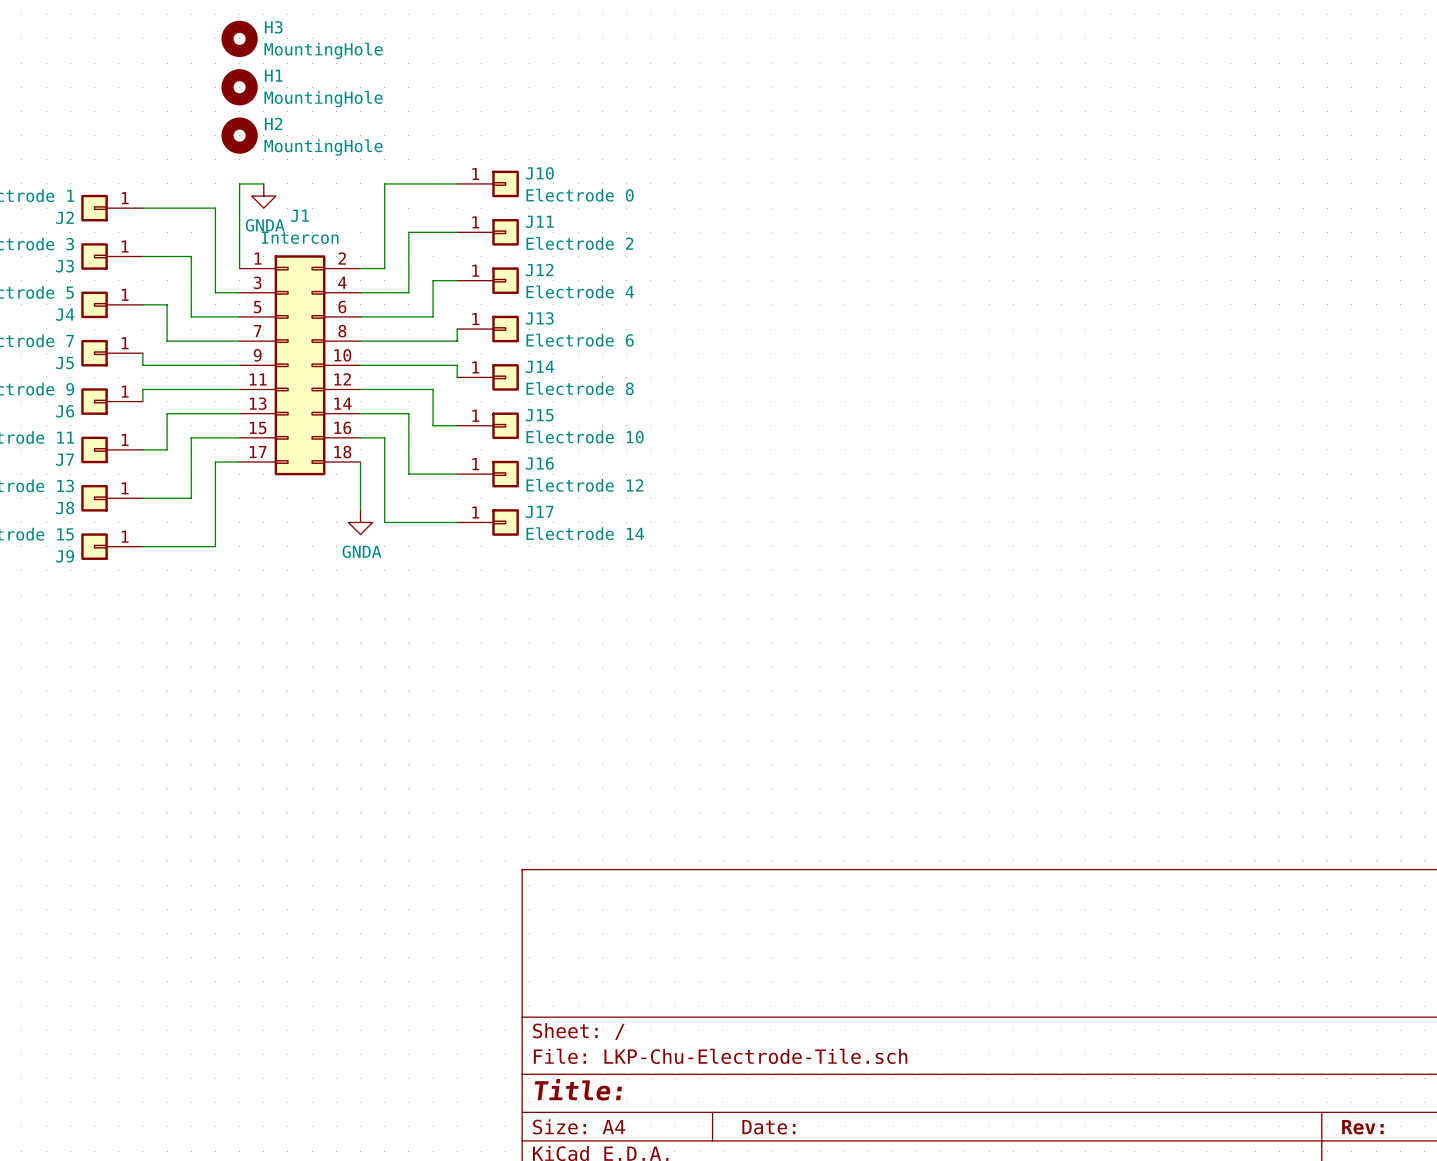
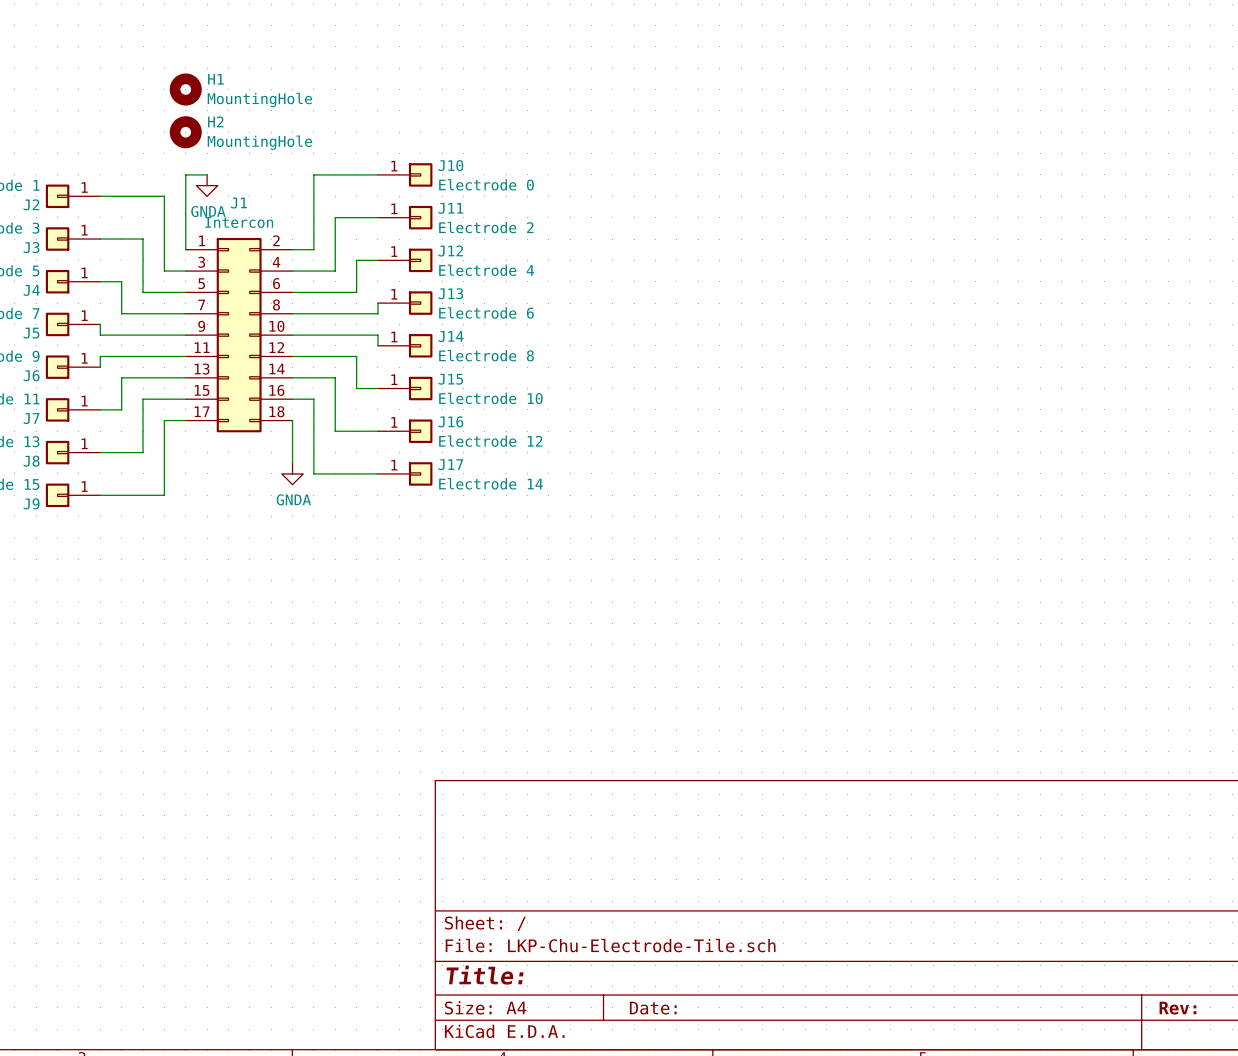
H3: MountingHole (239, 38) -> none

